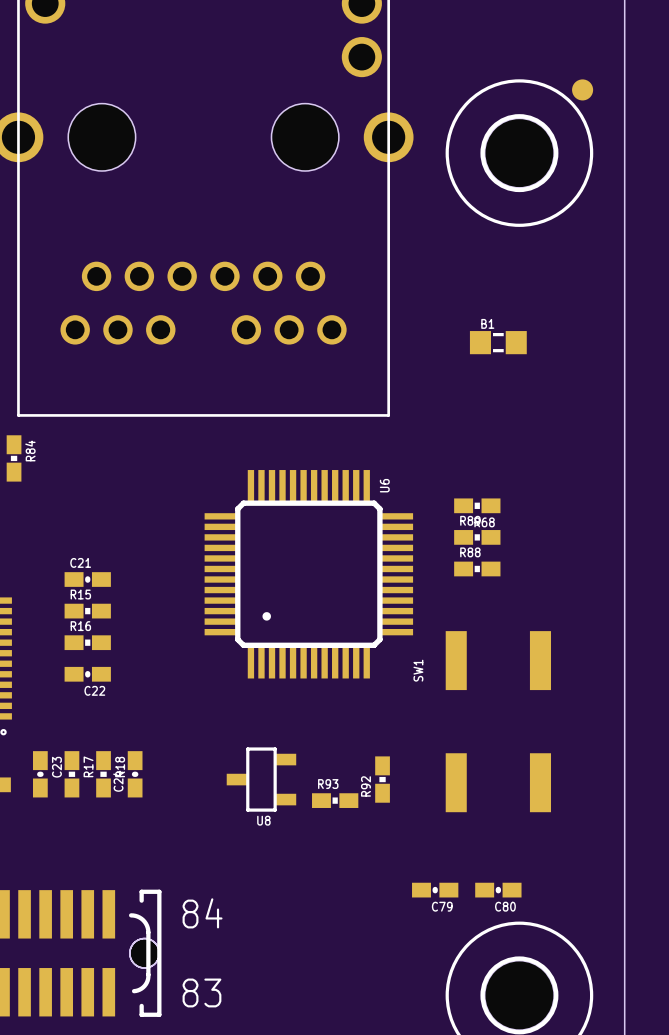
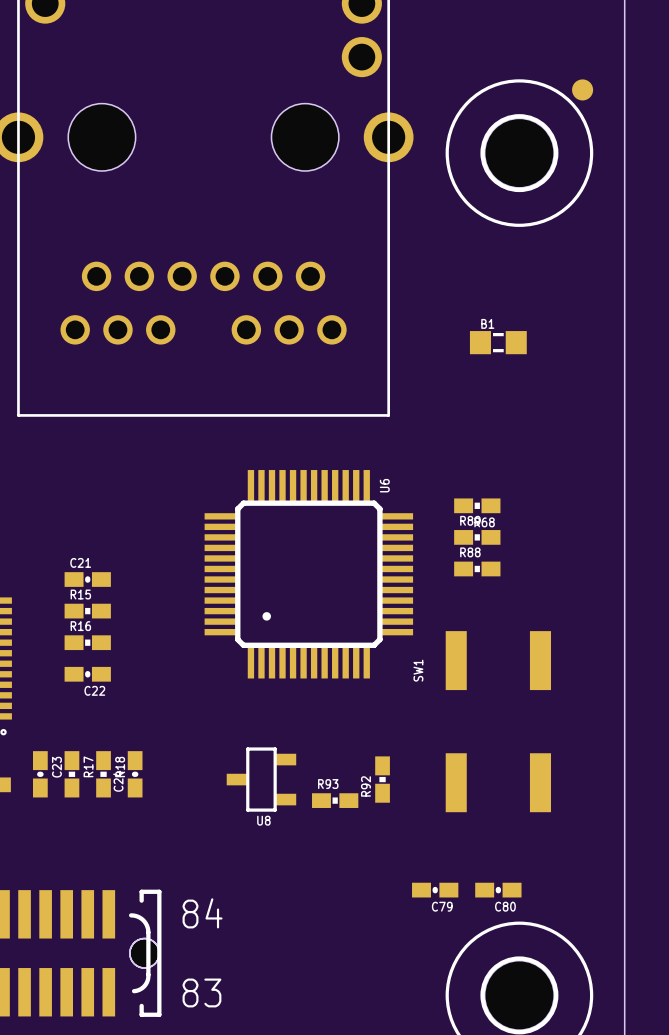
R84: (14, 458) -> none

